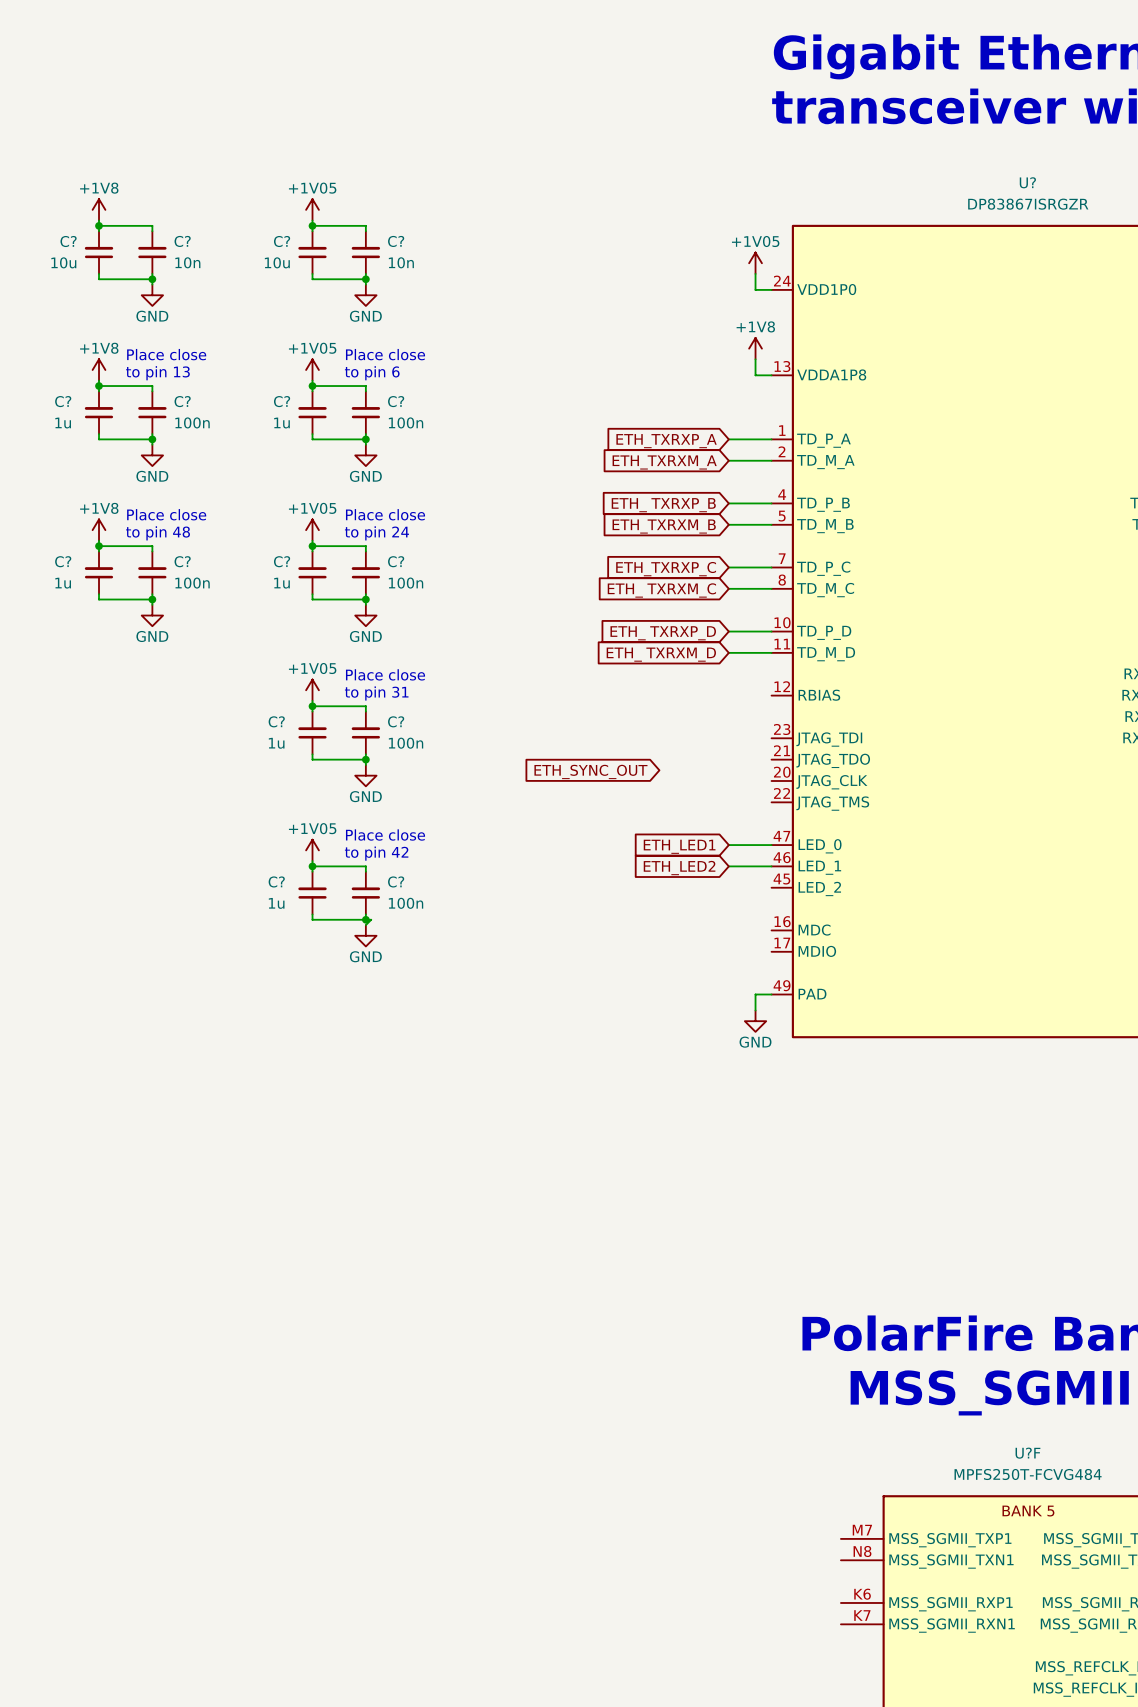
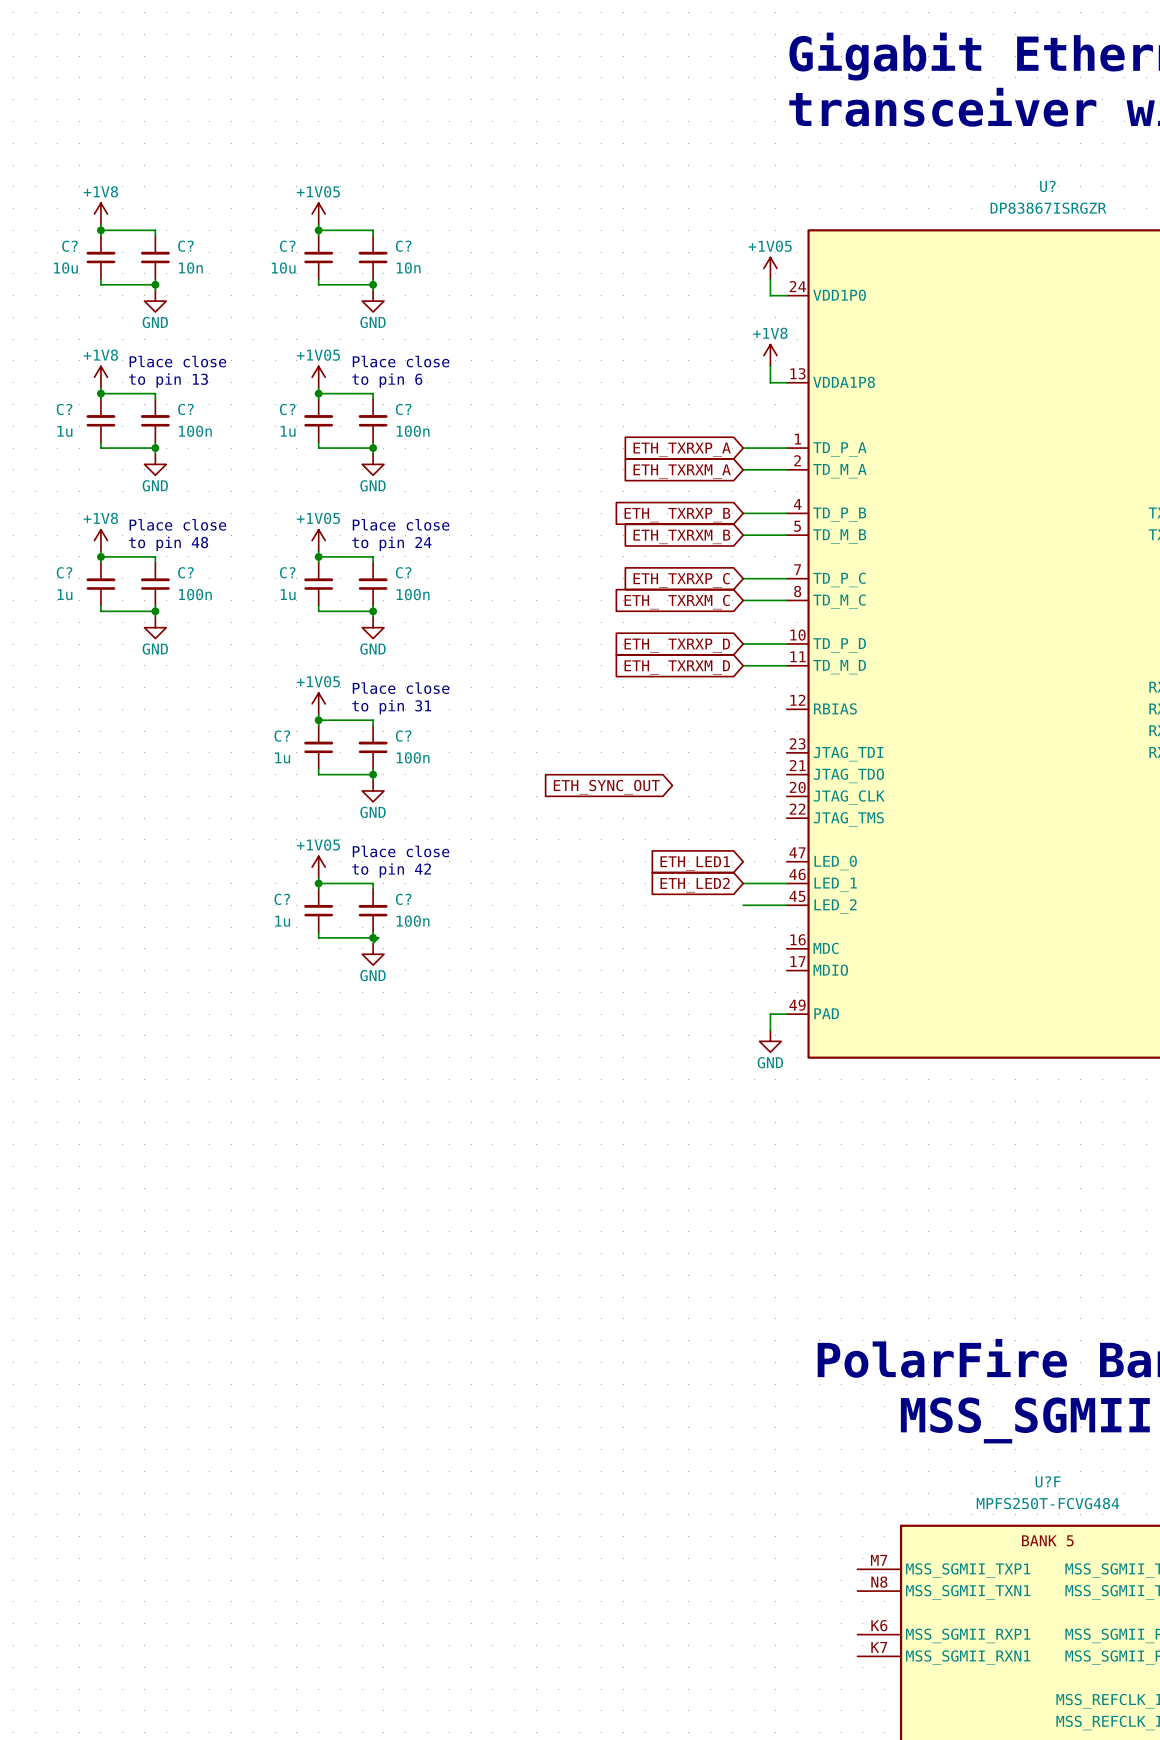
wire: (728, 845) (771, 845) -> (743, 905) (786, 905)

